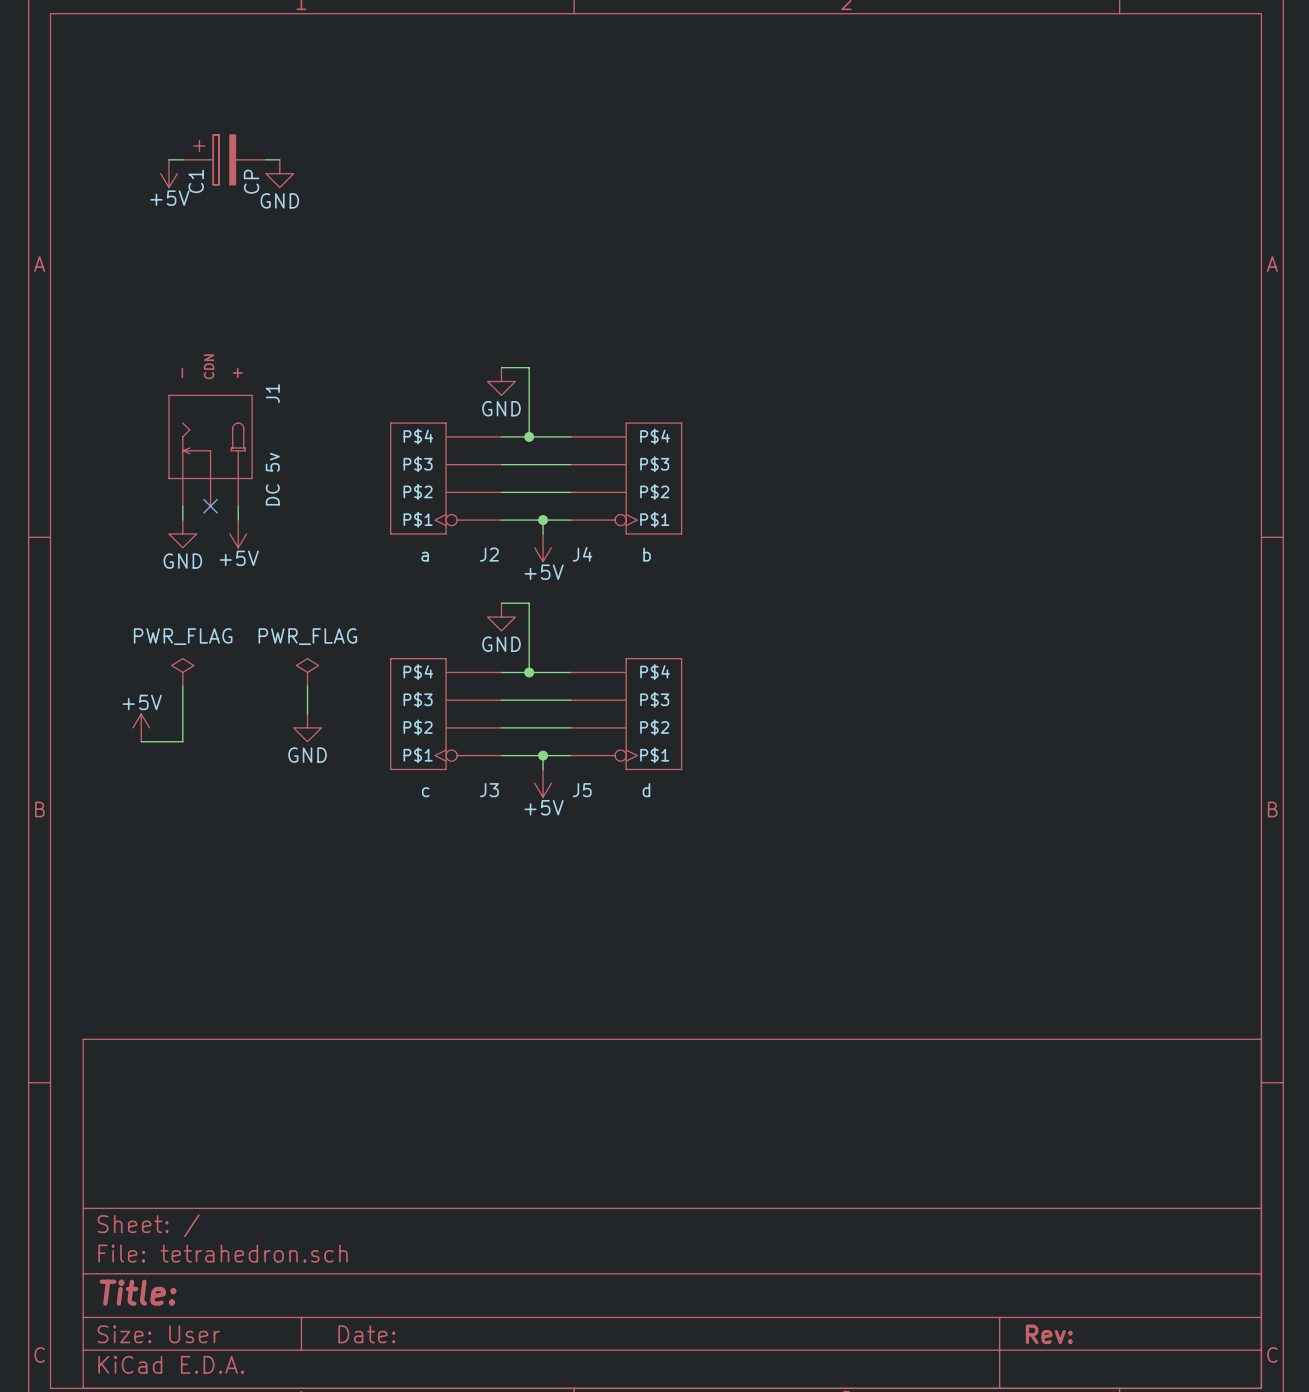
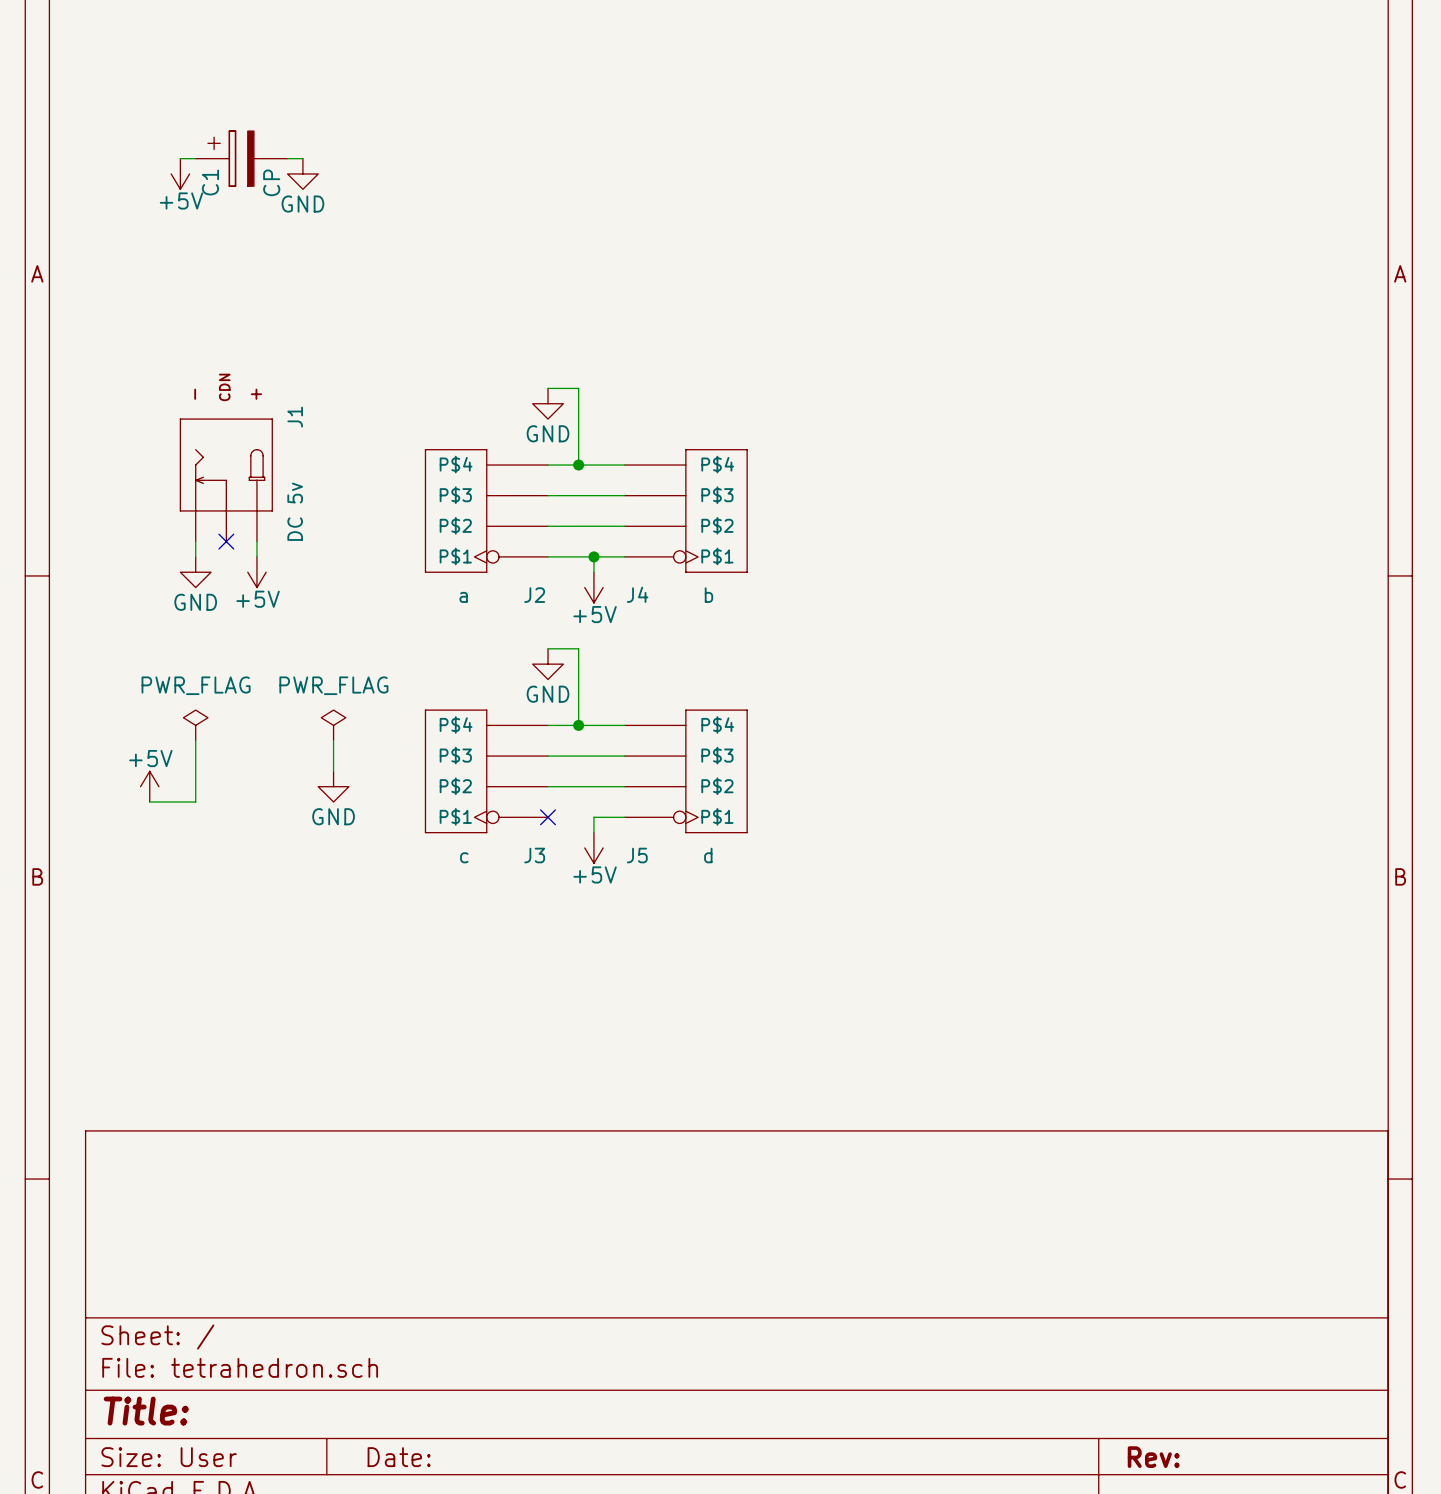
wire: (501, 755) (543, 755) -> none
no-connect mark: none -> (548, 817)
junction: (543, 755) -> none

